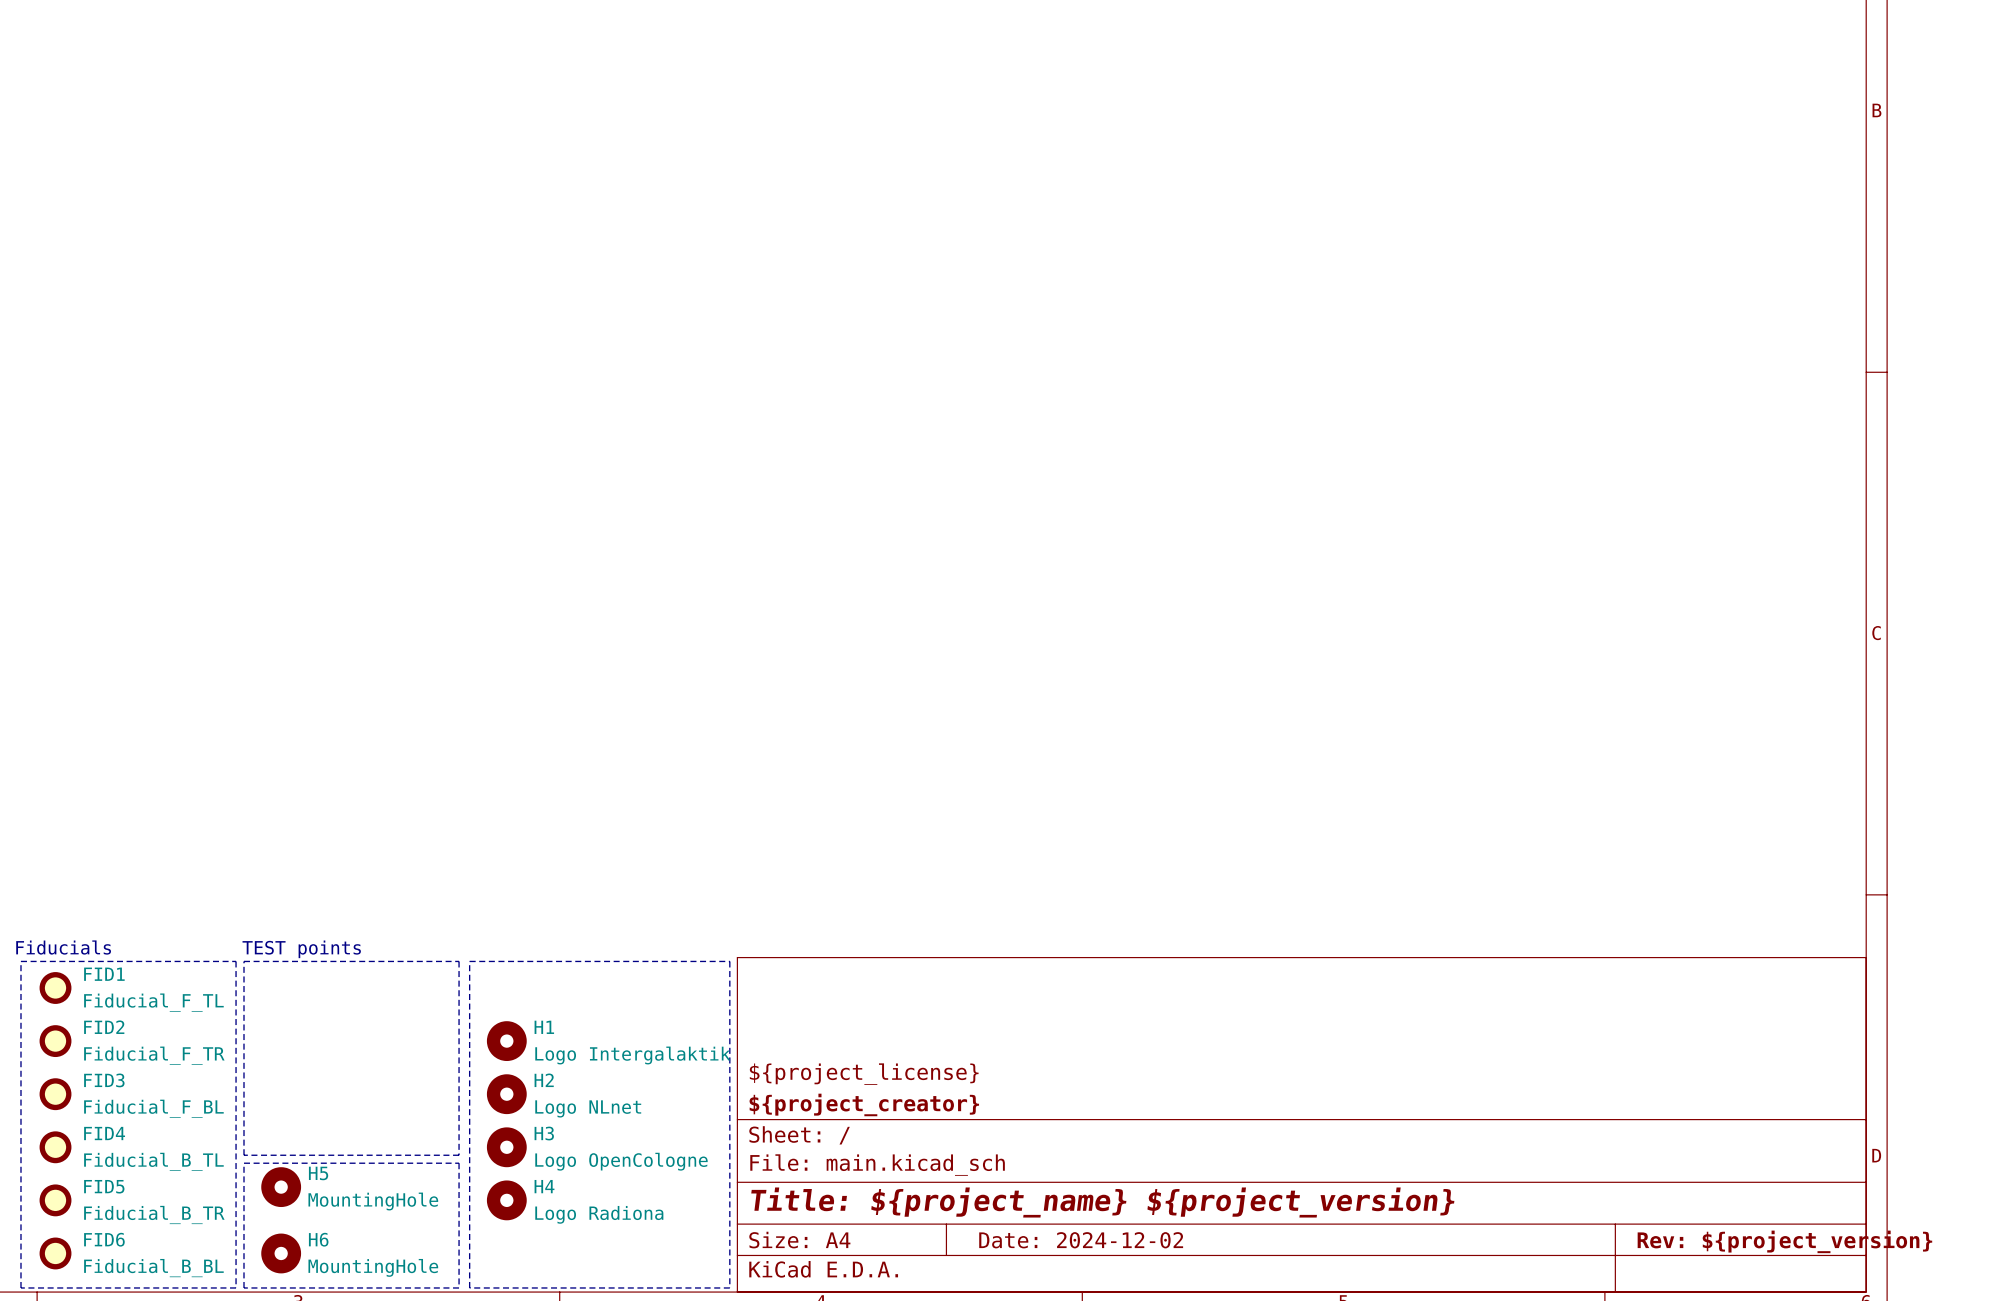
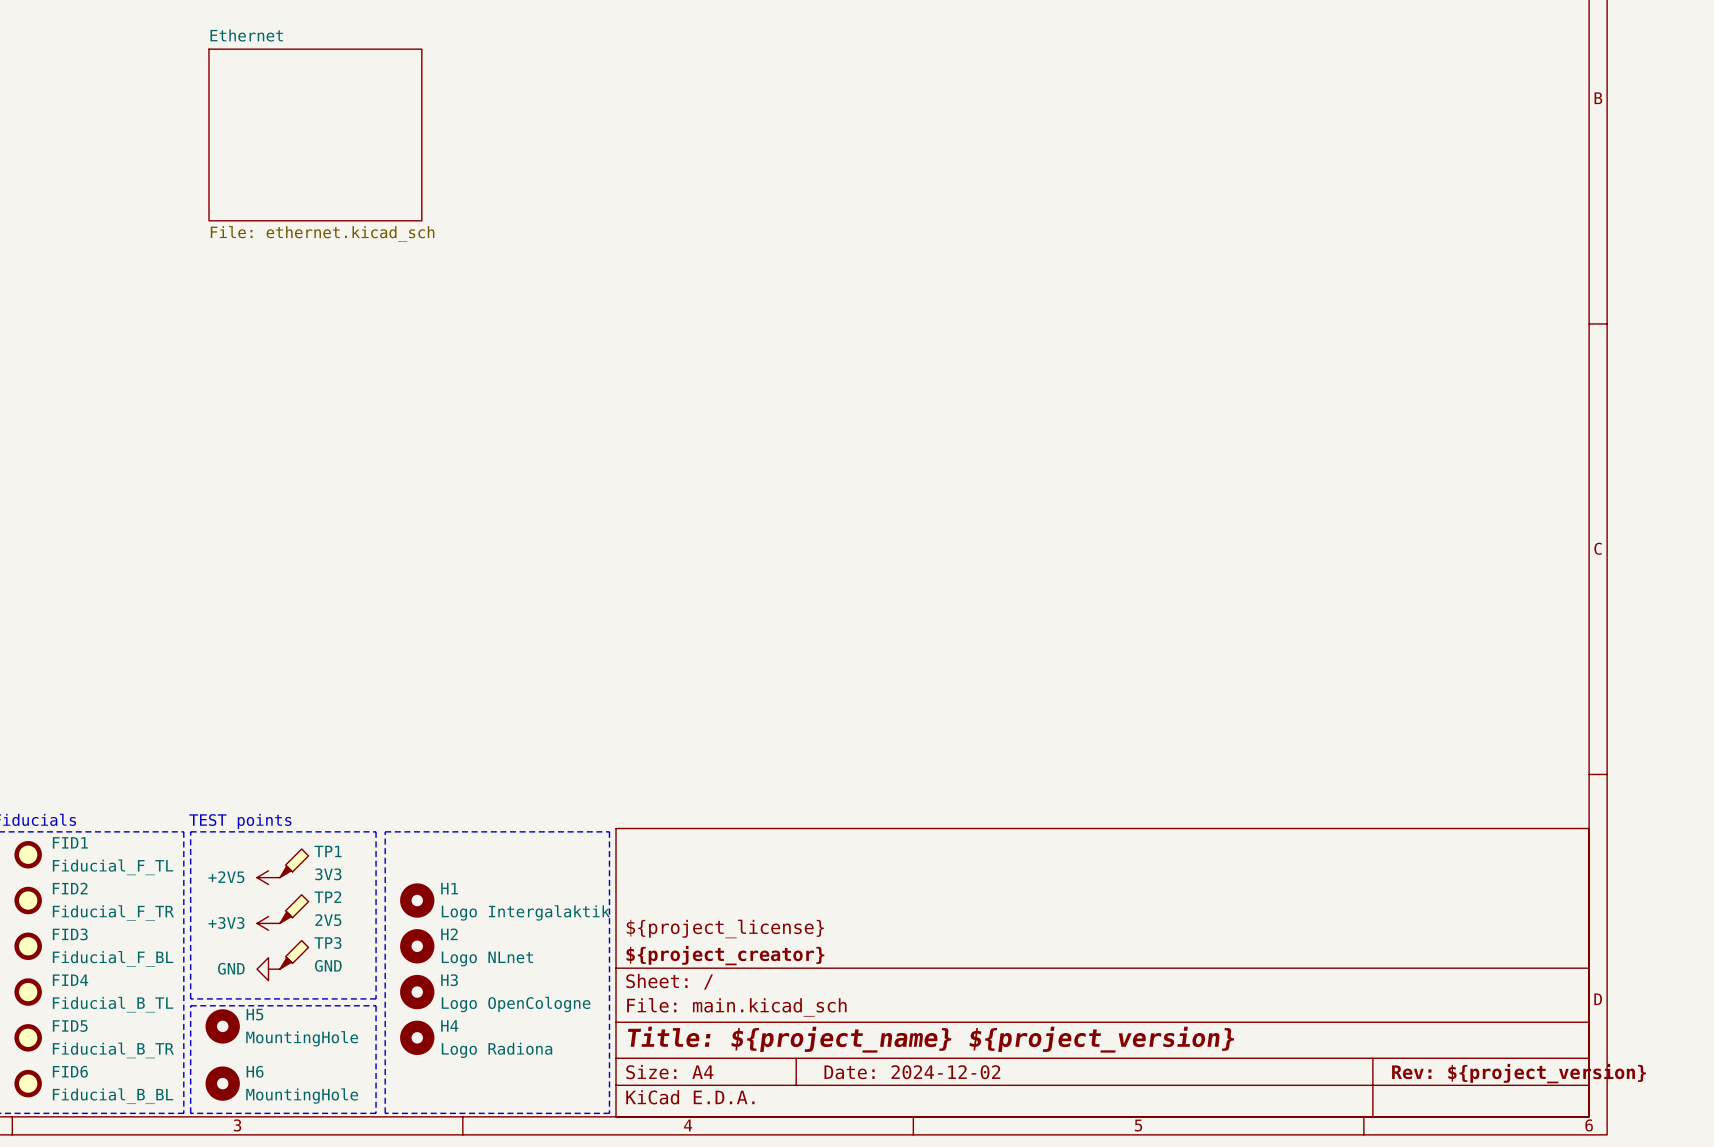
sheet Ethernet: none -> File: ethernet.kicad_sch (315, 134)
TP1: none -> 3V3 (294, 863)
power symbol: none -> +2V5 (268, 877)
TP2: none -> 2V5 (294, 909)
power symbol: none -> +3V3 (268, 923)
TP3: none -> GND (294, 954)
power symbol: none -> GND (268, 969)

